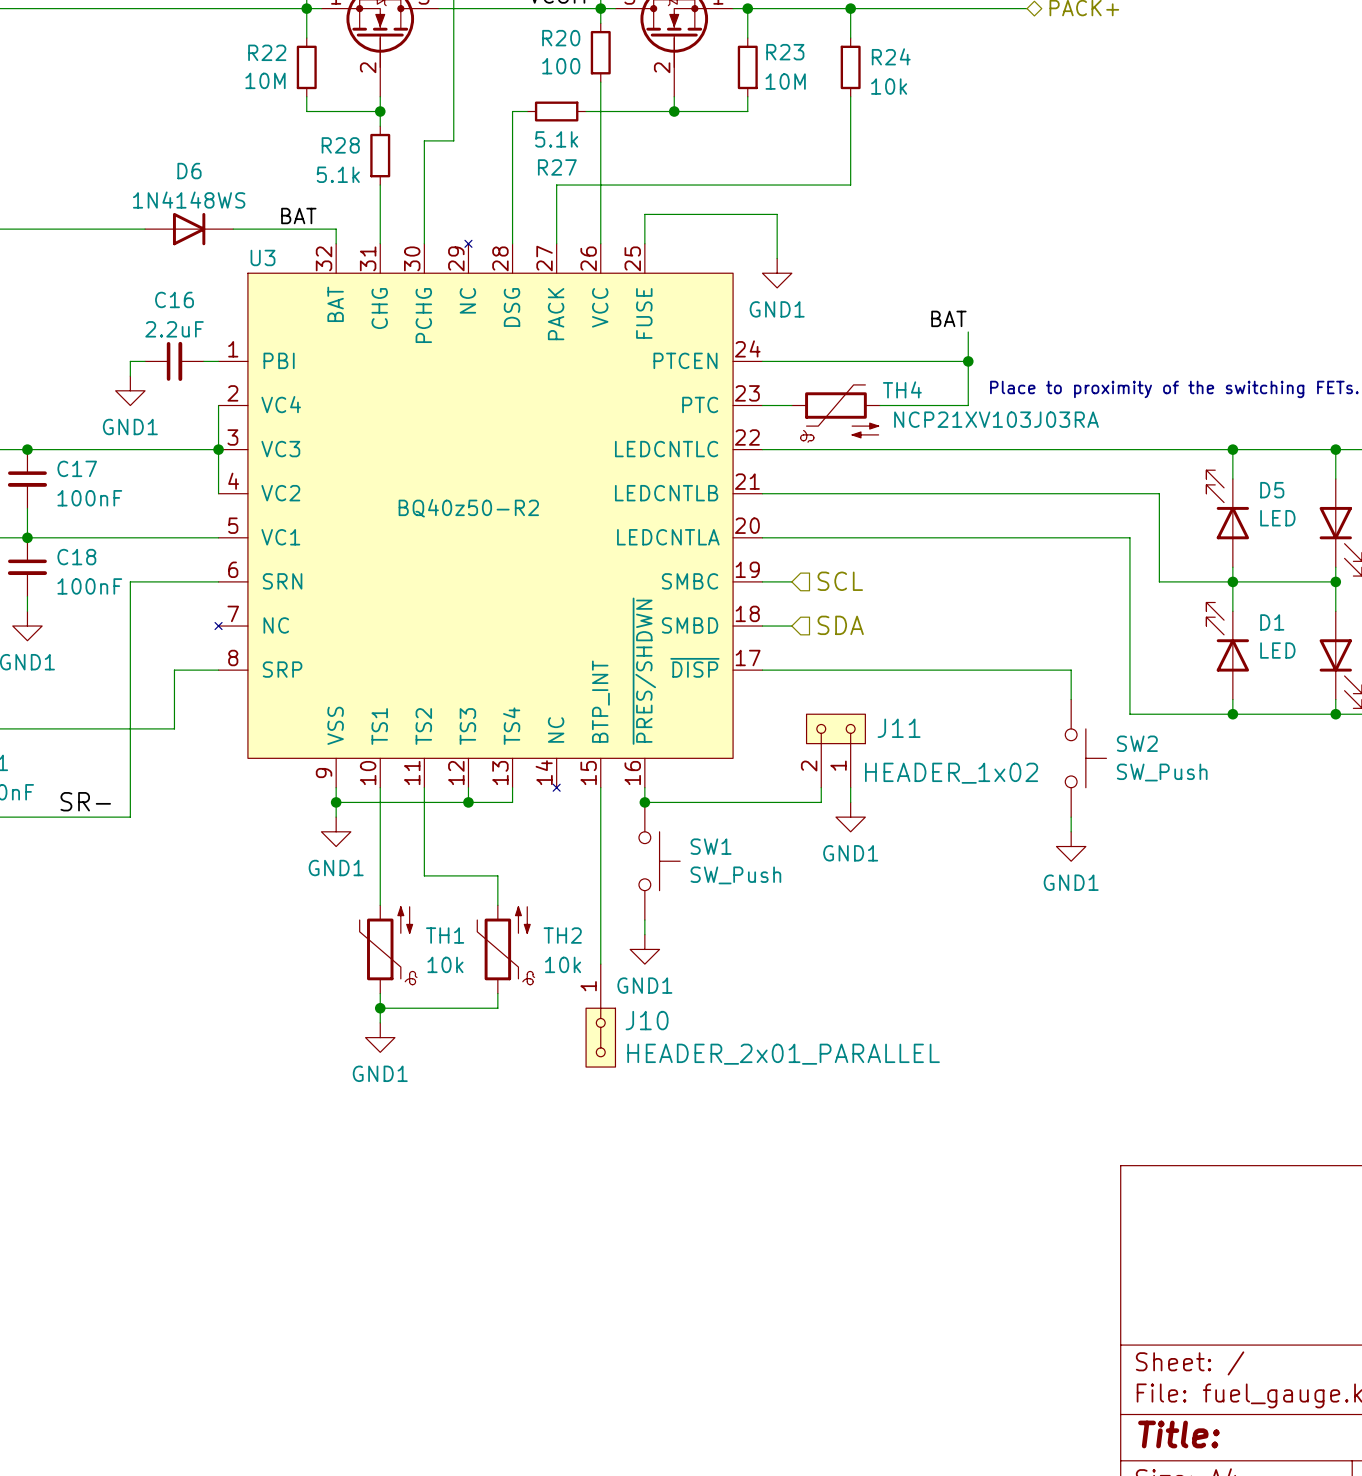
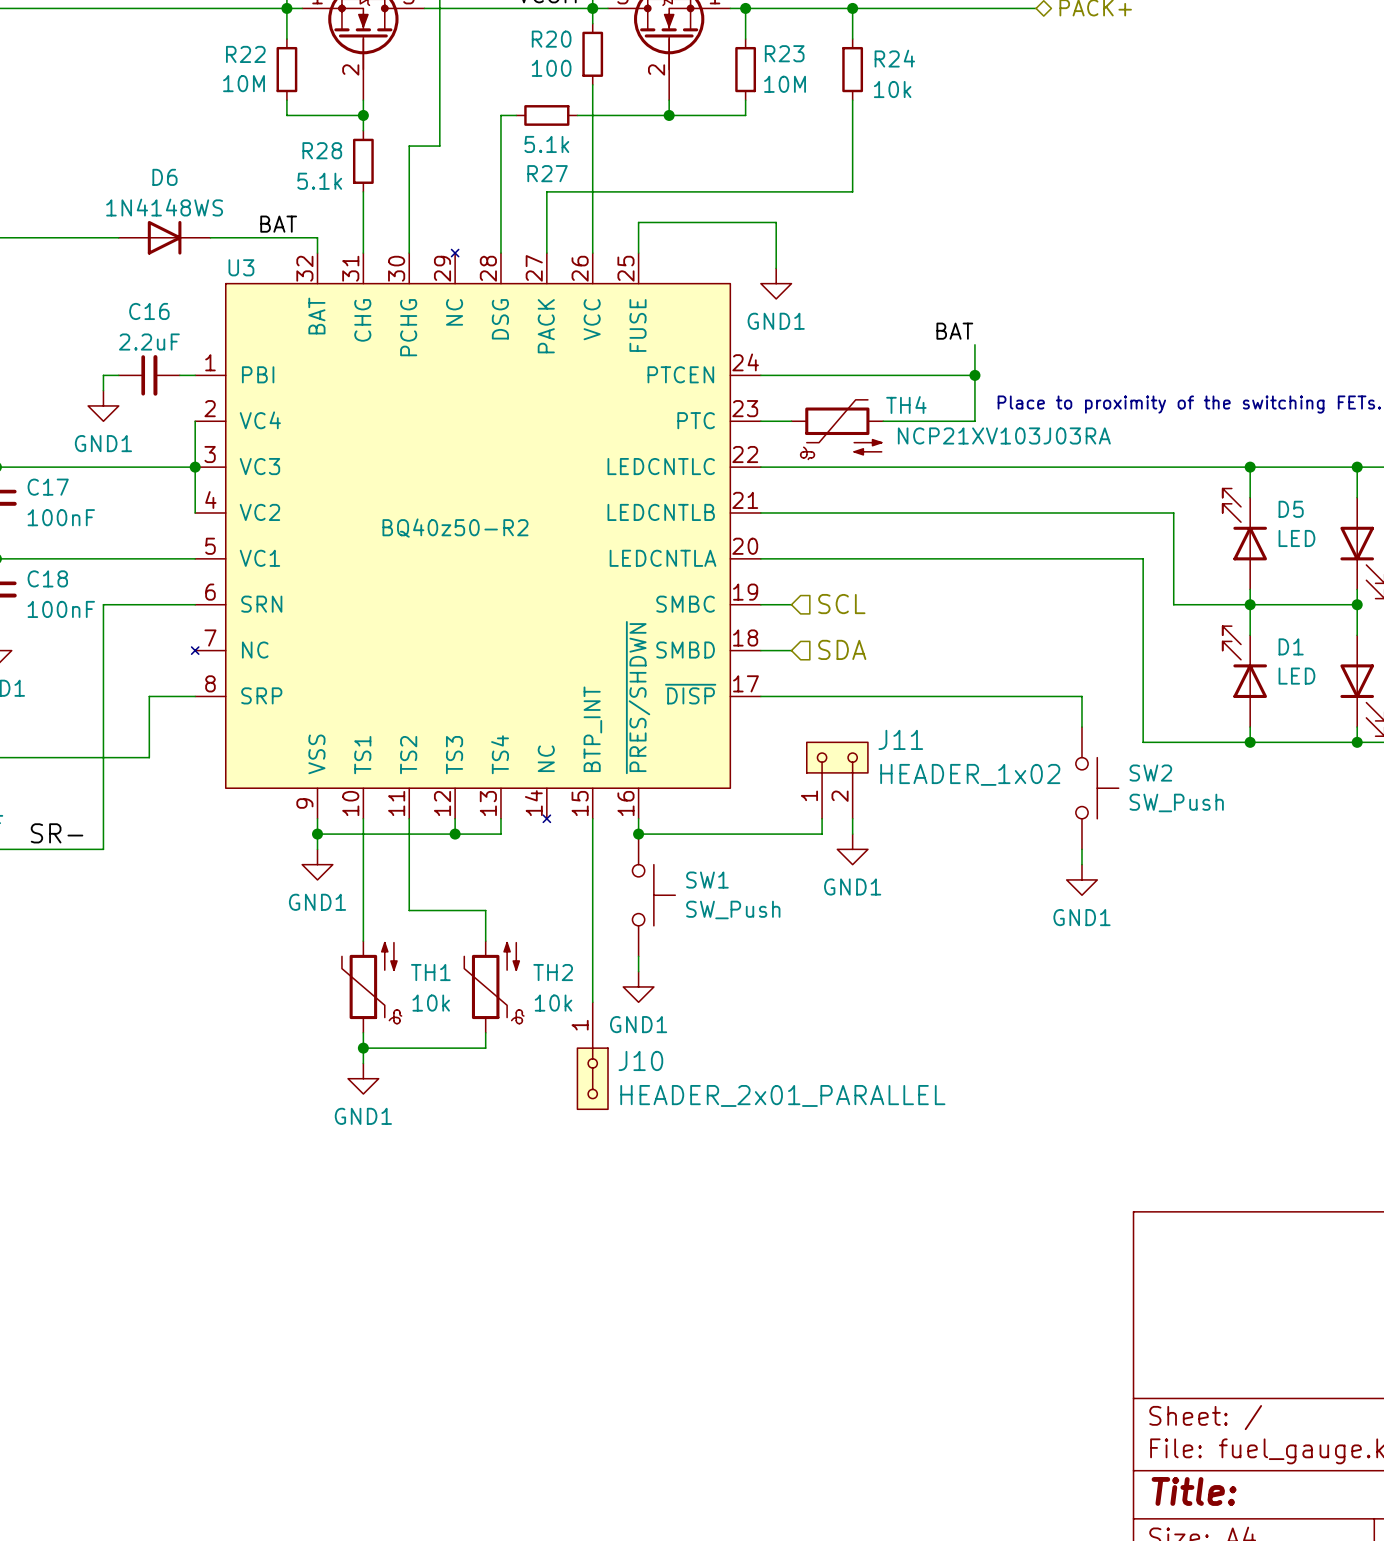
J11 flip: as is (835, 728) -> left-right (837, 757)
J11 value position: HEADER_1x02 (951, 773) -> HEADER_1x02 (970, 774)

